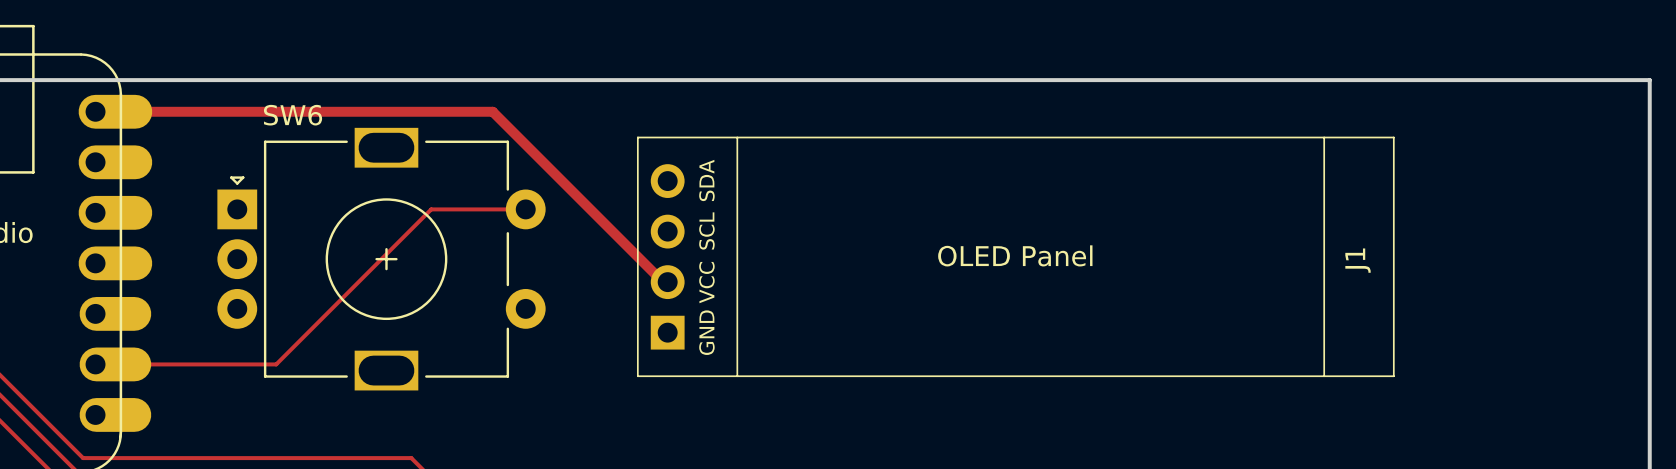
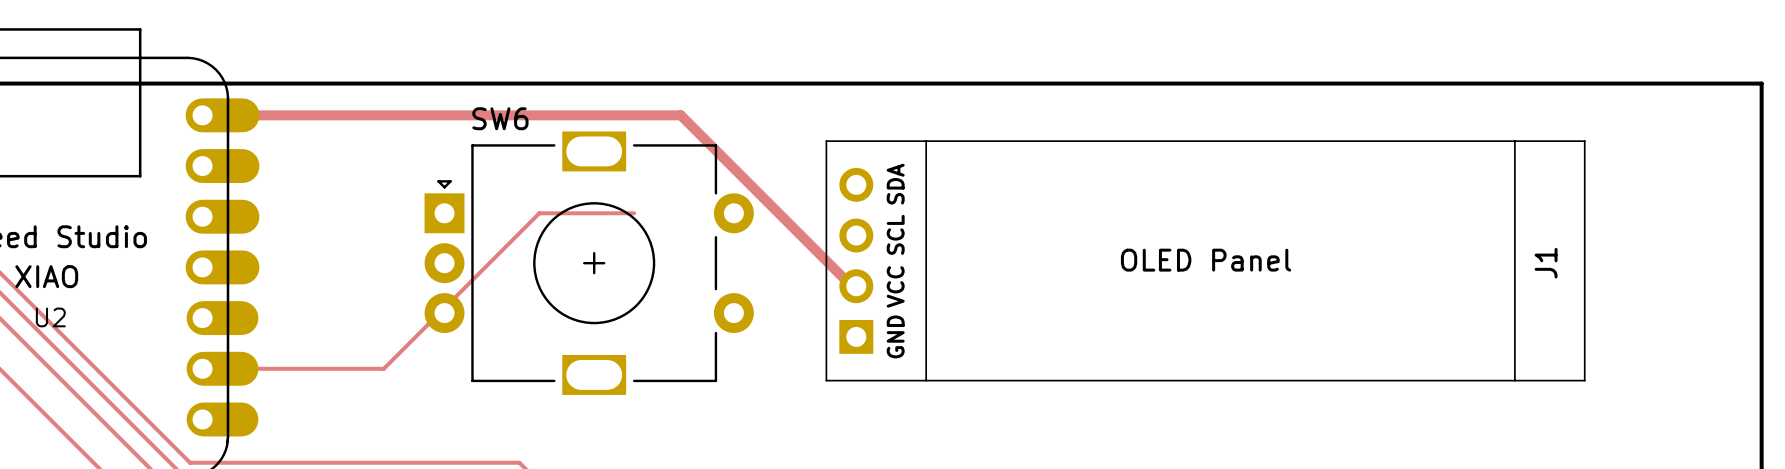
track: (492, 111) (663, 282) (667, 282) -> (601, 115) (680, 115) (851, 286) (856, 286)
J1 position: (1015, 256) -> (1205, 260)
SW6 position: (381, 259) -> (589, 263)

